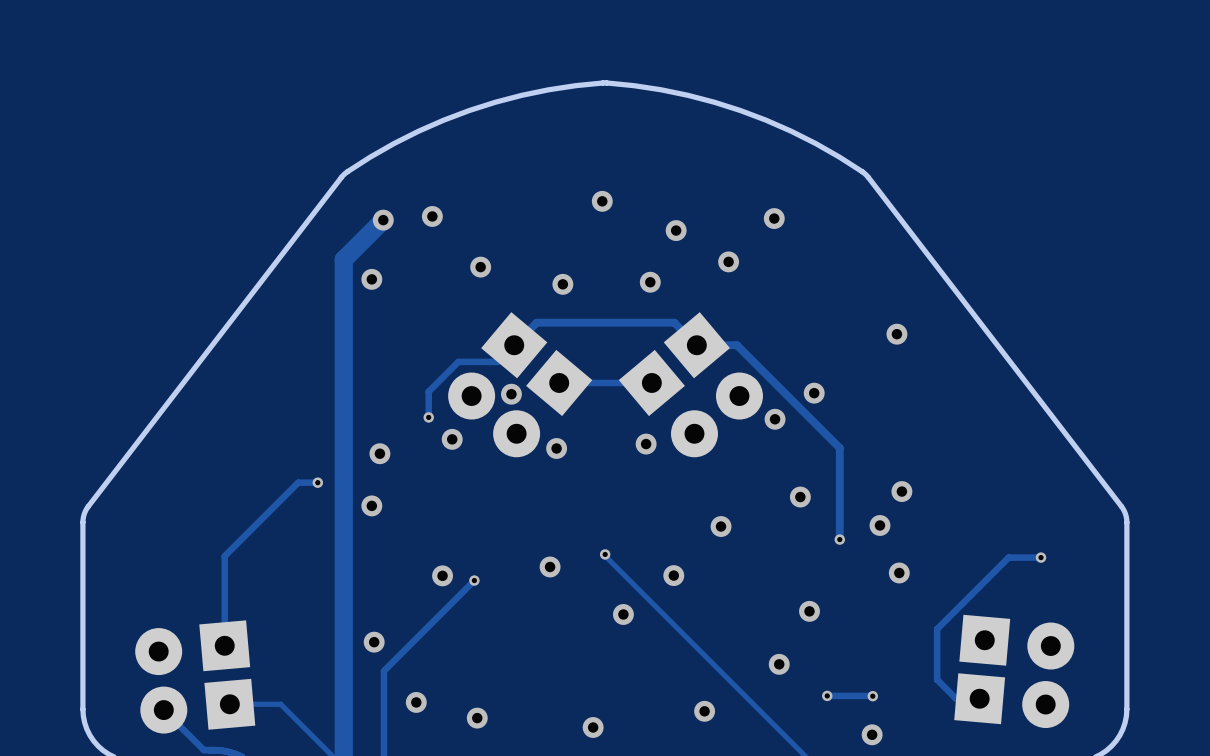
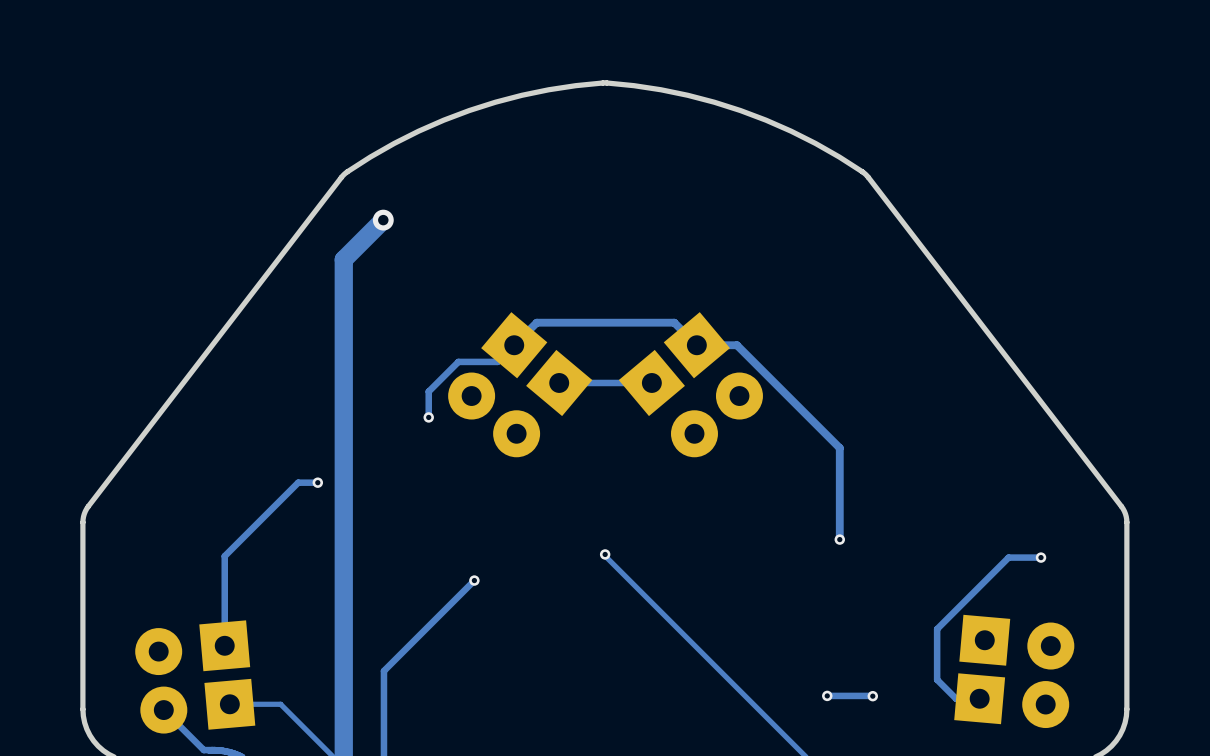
via: (602, 201) -> none
via: (432, 216) -> none
via: (774, 218) -> none
via: (676, 230) -> none
via: (728, 261) -> none
via: (480, 267) -> none
via: (371, 279) -> none
via: (650, 282) -> none
via: (562, 284) -> none
via: (896, 334) -> none
via: (814, 393) -> none
via: (511, 394) -> none
via: (775, 419) -> none
via: (452, 439) -> none
via: (646, 444) -> none
via: (556, 448) -> none
via: (379, 453) -> none
via: (901, 491) -> none
via: (800, 497) -> none
via: (371, 505) -> none
via: (879, 525) -> none
via: (721, 526) -> none
via: (550, 566) -> none
via: (899, 572) -> none
via: (442, 575) -> none
via: (673, 575) -> none
via: (809, 611) -> none
via: (623, 614) -> none
via: (374, 642) -> none
via: (779, 664) -> none
via: (416, 702) -> none
via: (704, 711) -> none
via: (477, 718) -> none
via: (593, 727) -> none
via: (872, 734) -> none

